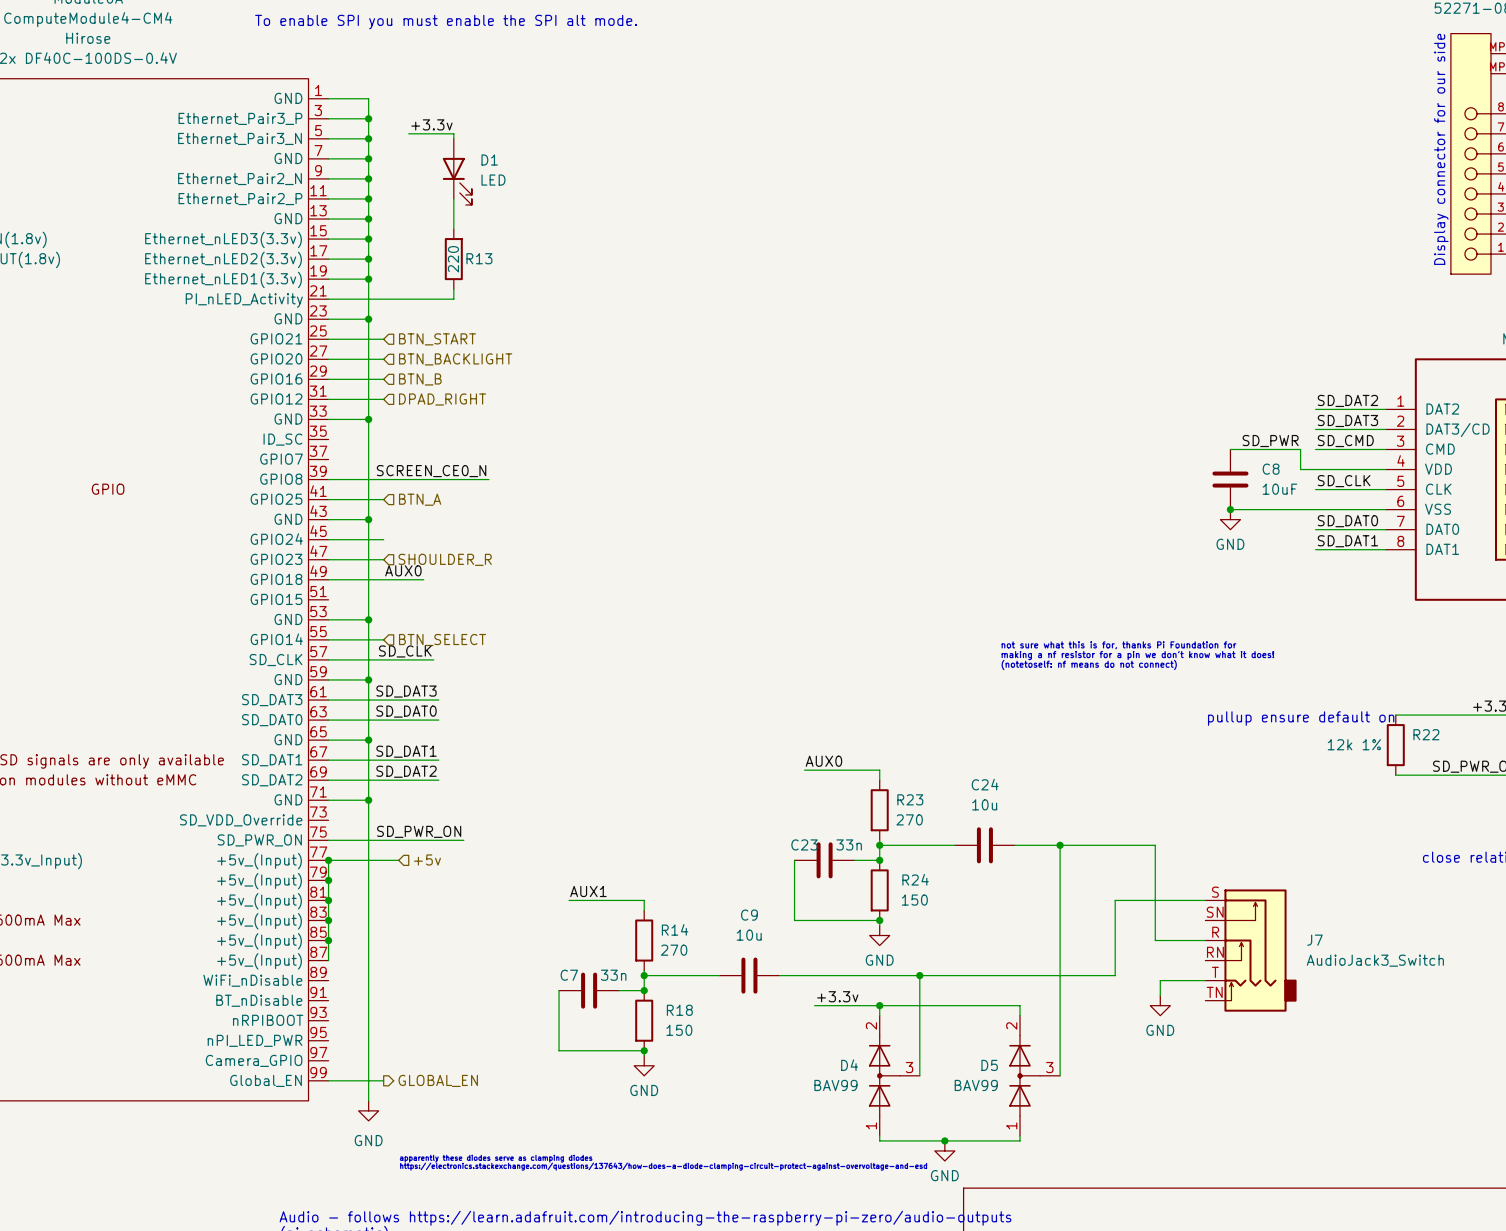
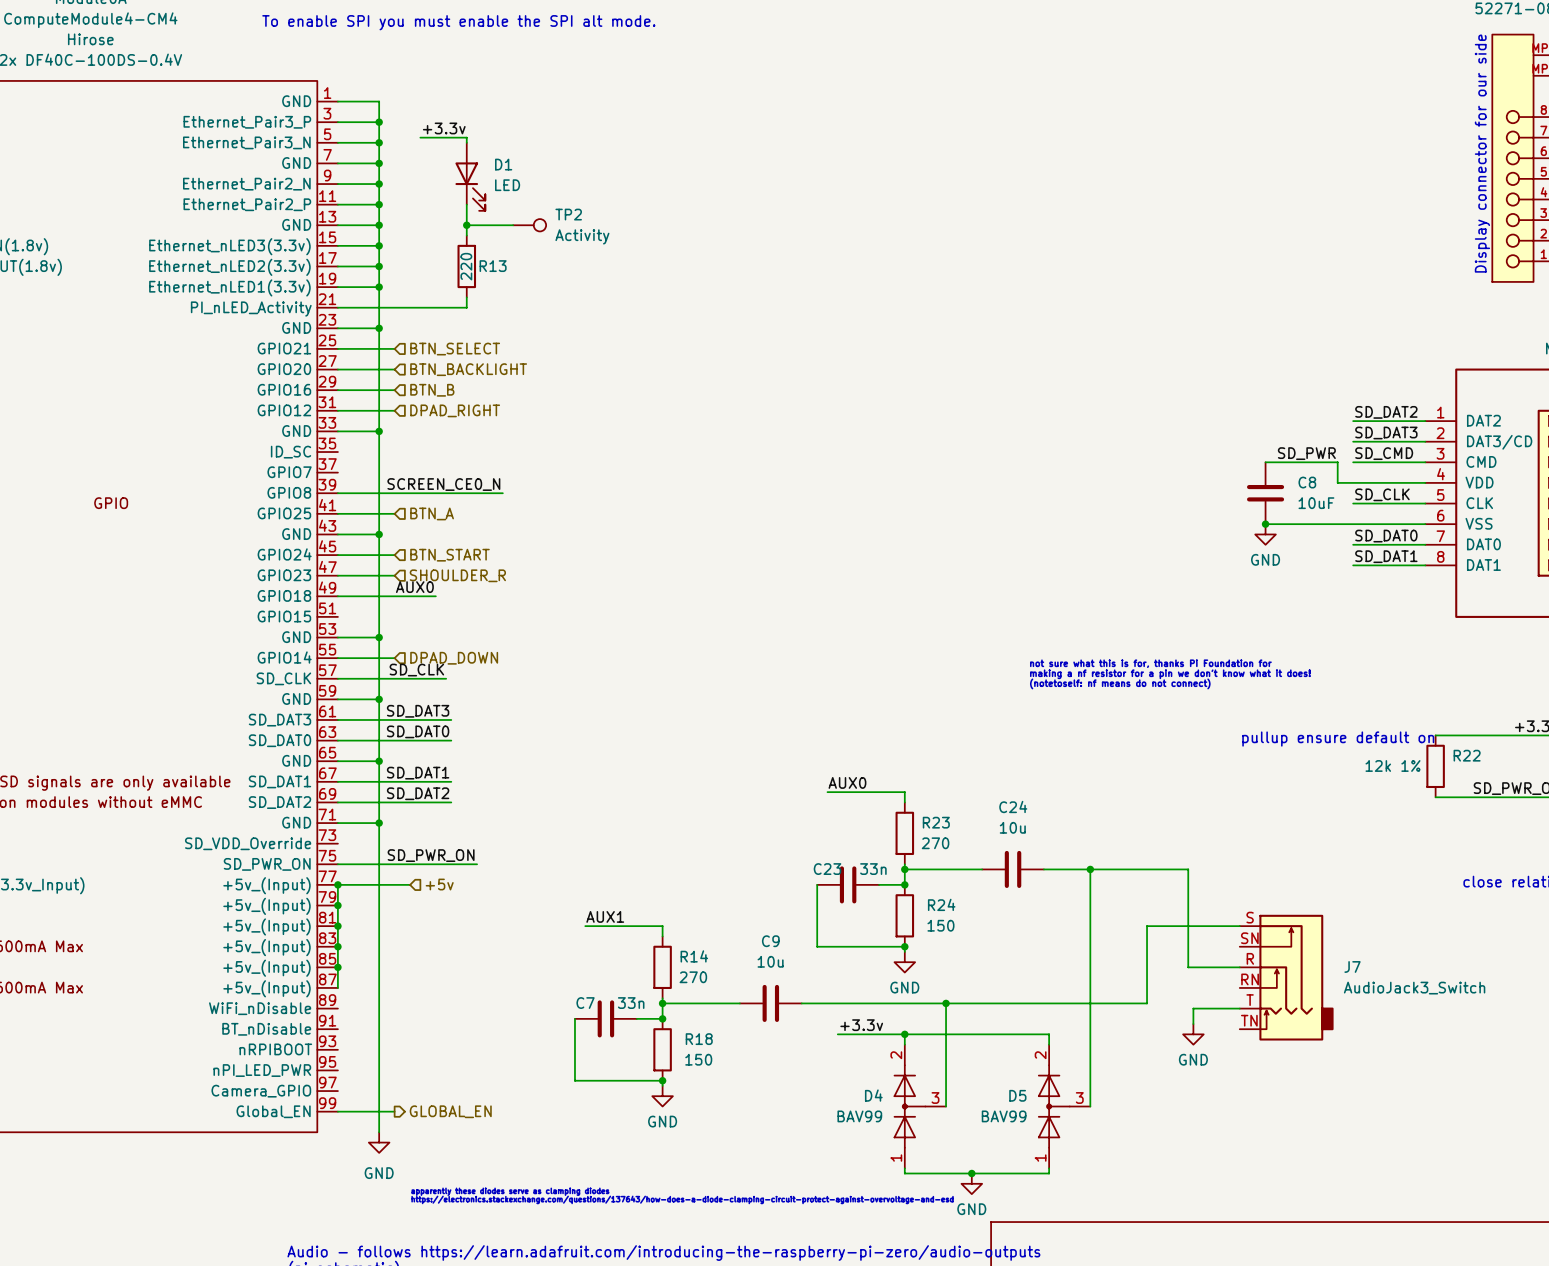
wire: none -> (466, 225) (513, 225)
junction: none -> (466, 225)
TP2: none -> Activity (529, 225)
hierarchical label: BTN_START (437, 339) -> BTN_SELECT (455, 349)
hierarchical label: none -> BTN_START (449, 555)
hierarchical label: BTN_SELECT (442, 639) -> DPAD_DOWN (454, 658)

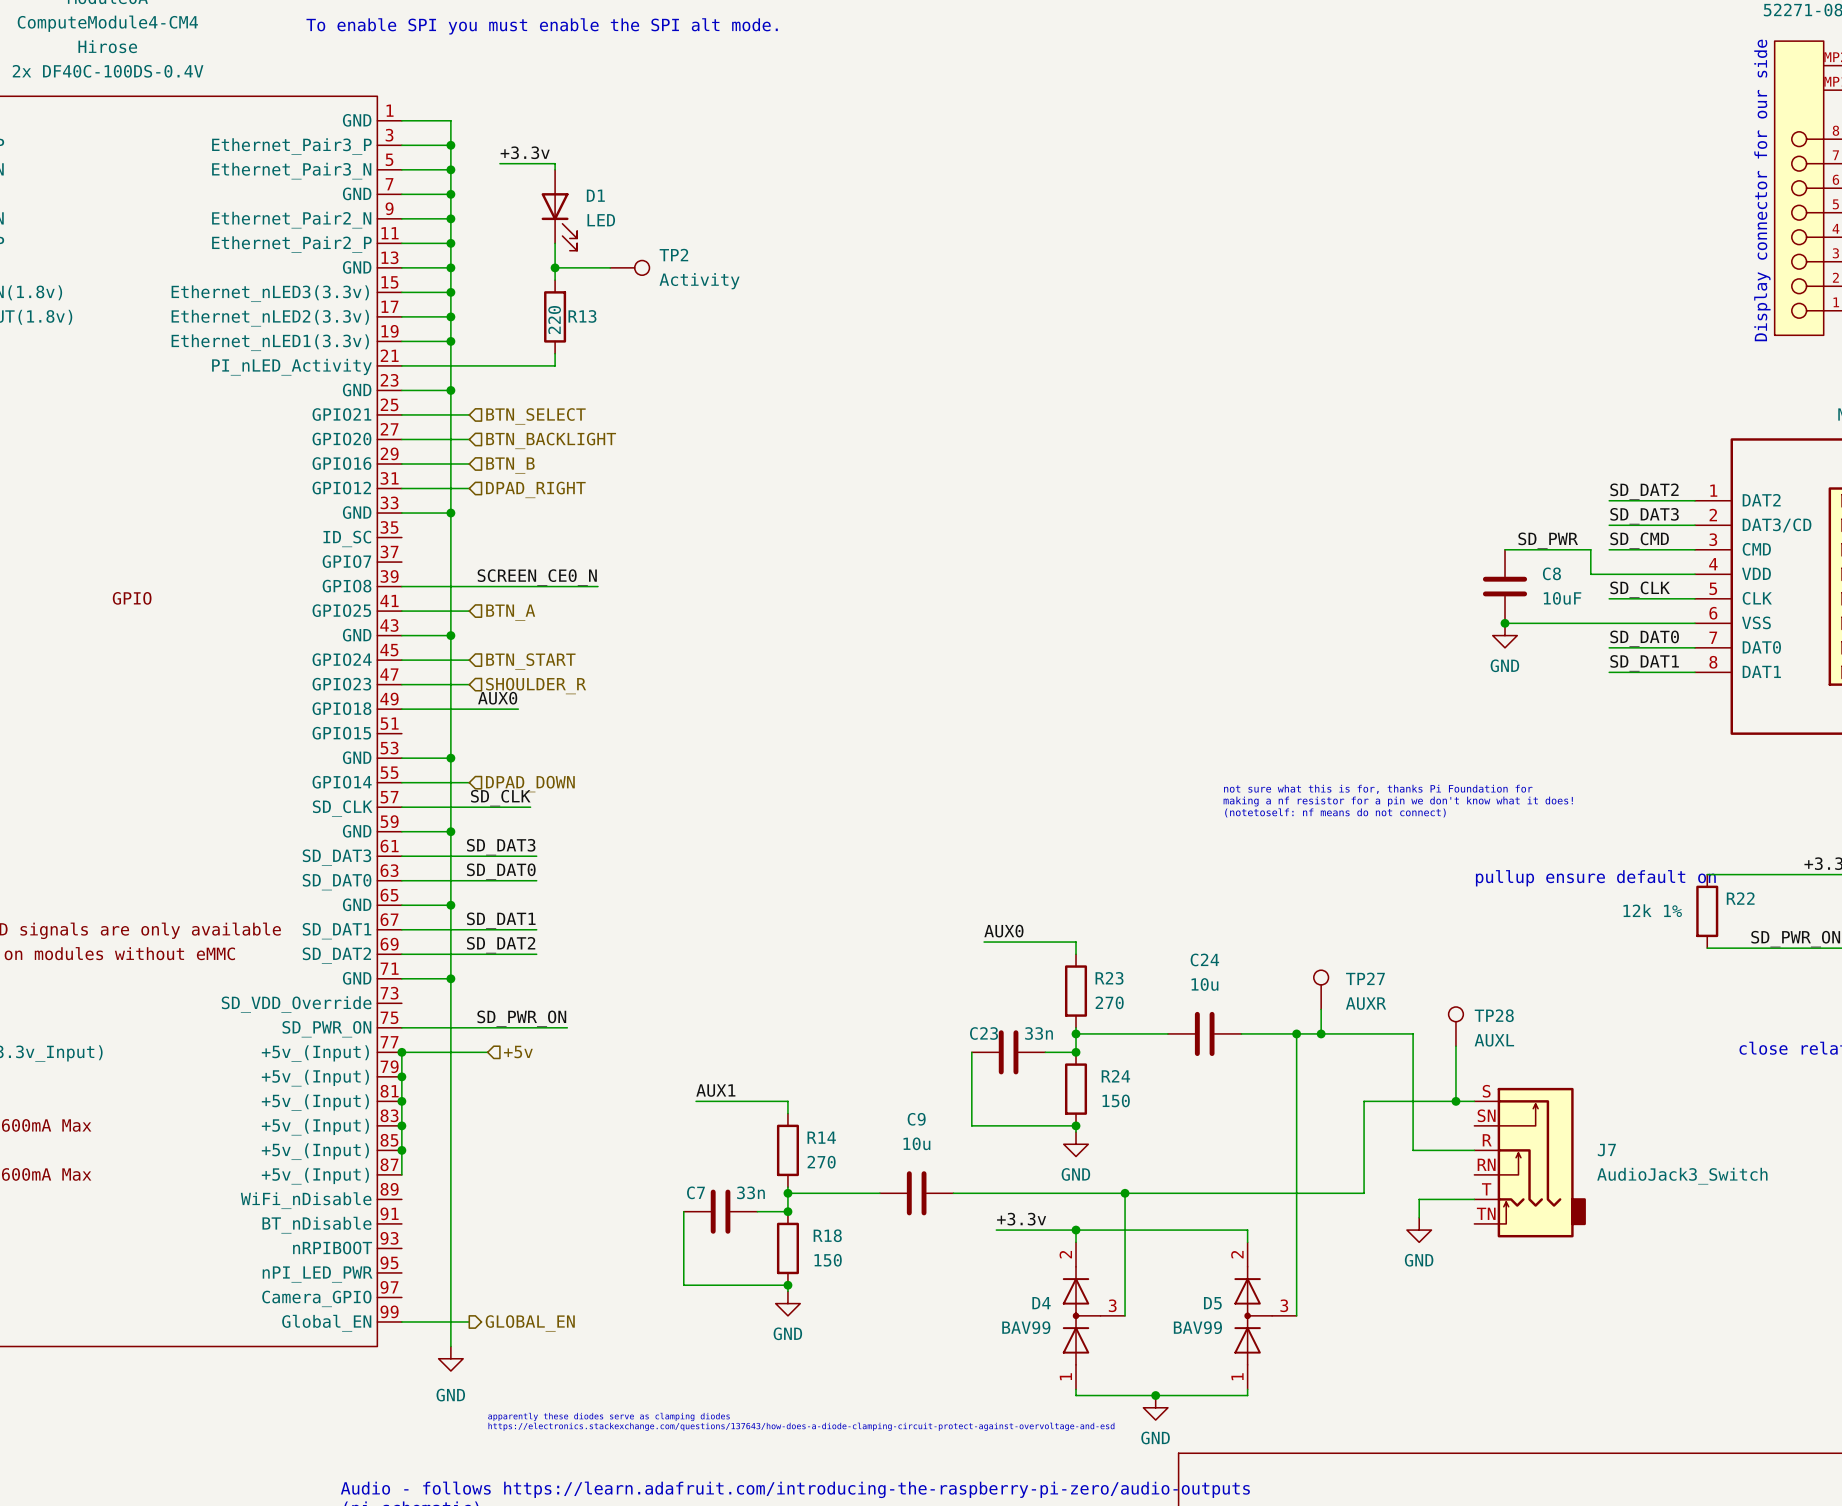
TP27: none -> AUXR (1321, 989)
wire: none -> (1321, 1009) (1321, 1033)
TP28: none -> AUXL (1455, 1026)
junction: none -> (1321, 1033)
wire: none -> (1455, 1046) (1455, 1101)
junction: none -> (1455, 1101)

